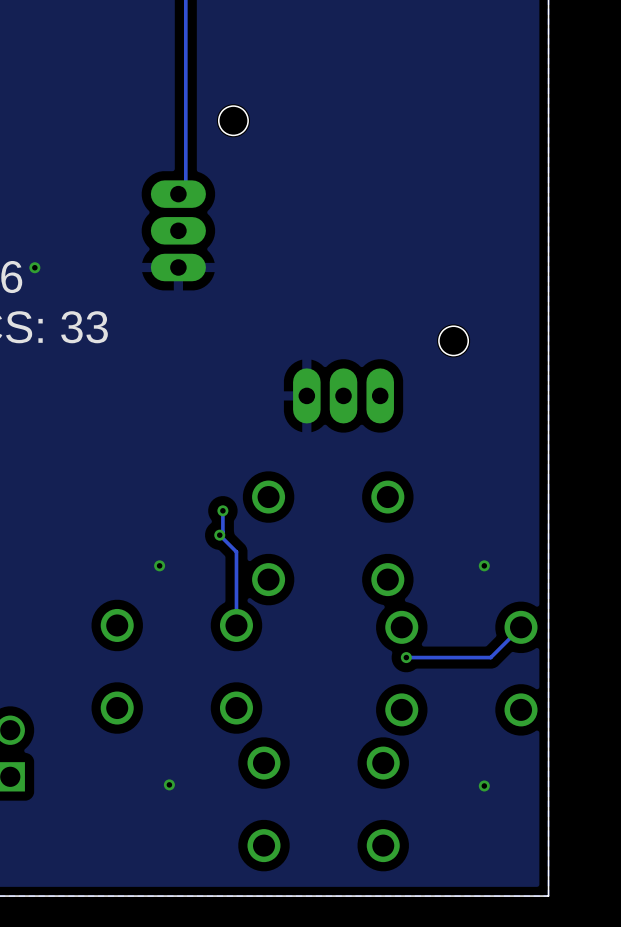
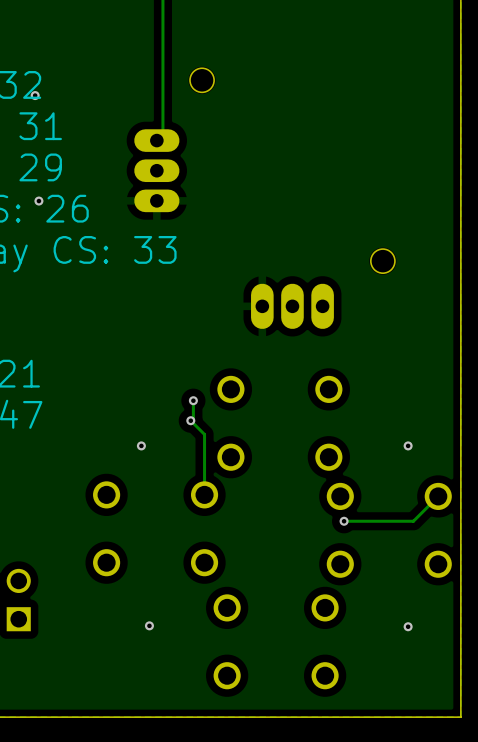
via: none -> (35, 95)

